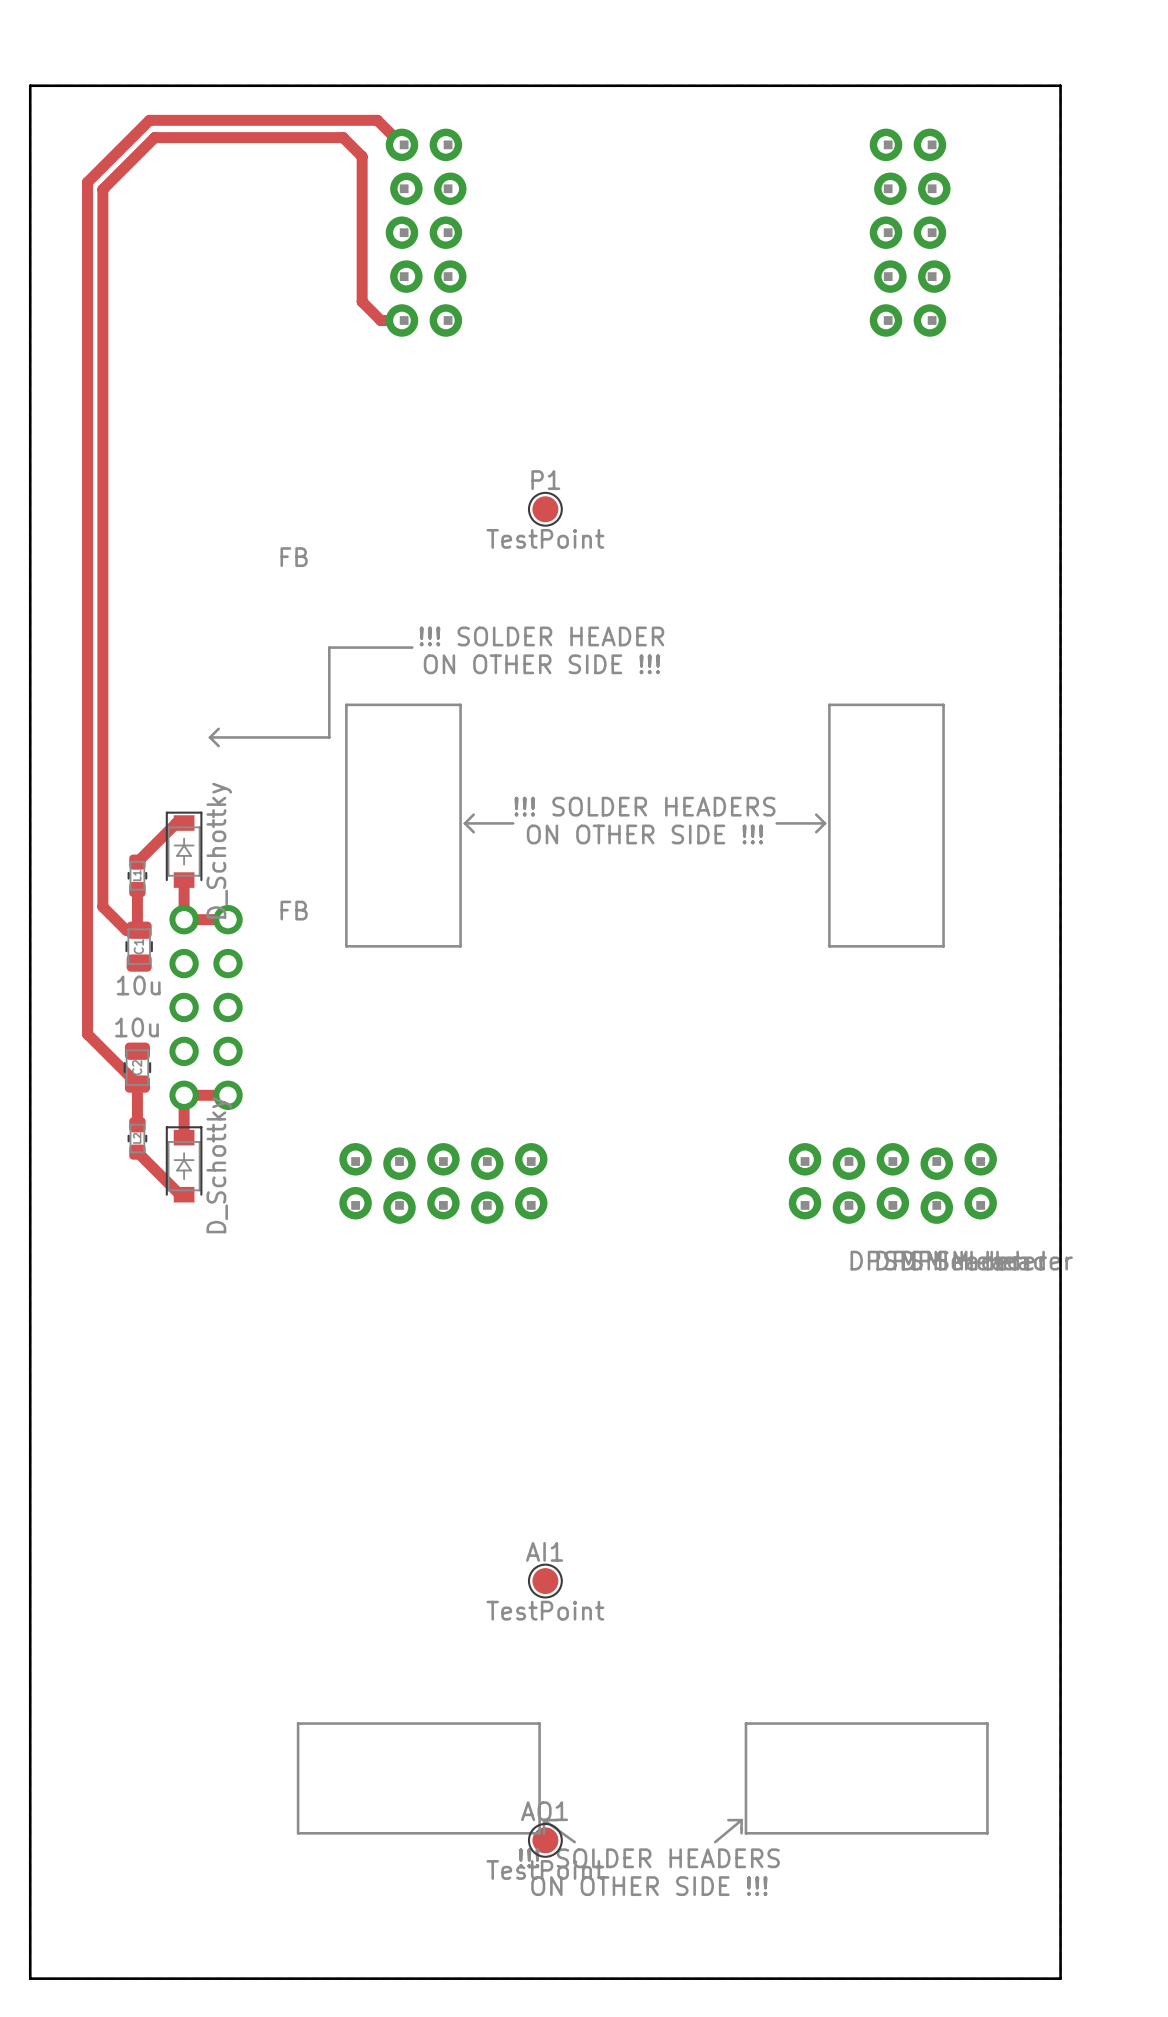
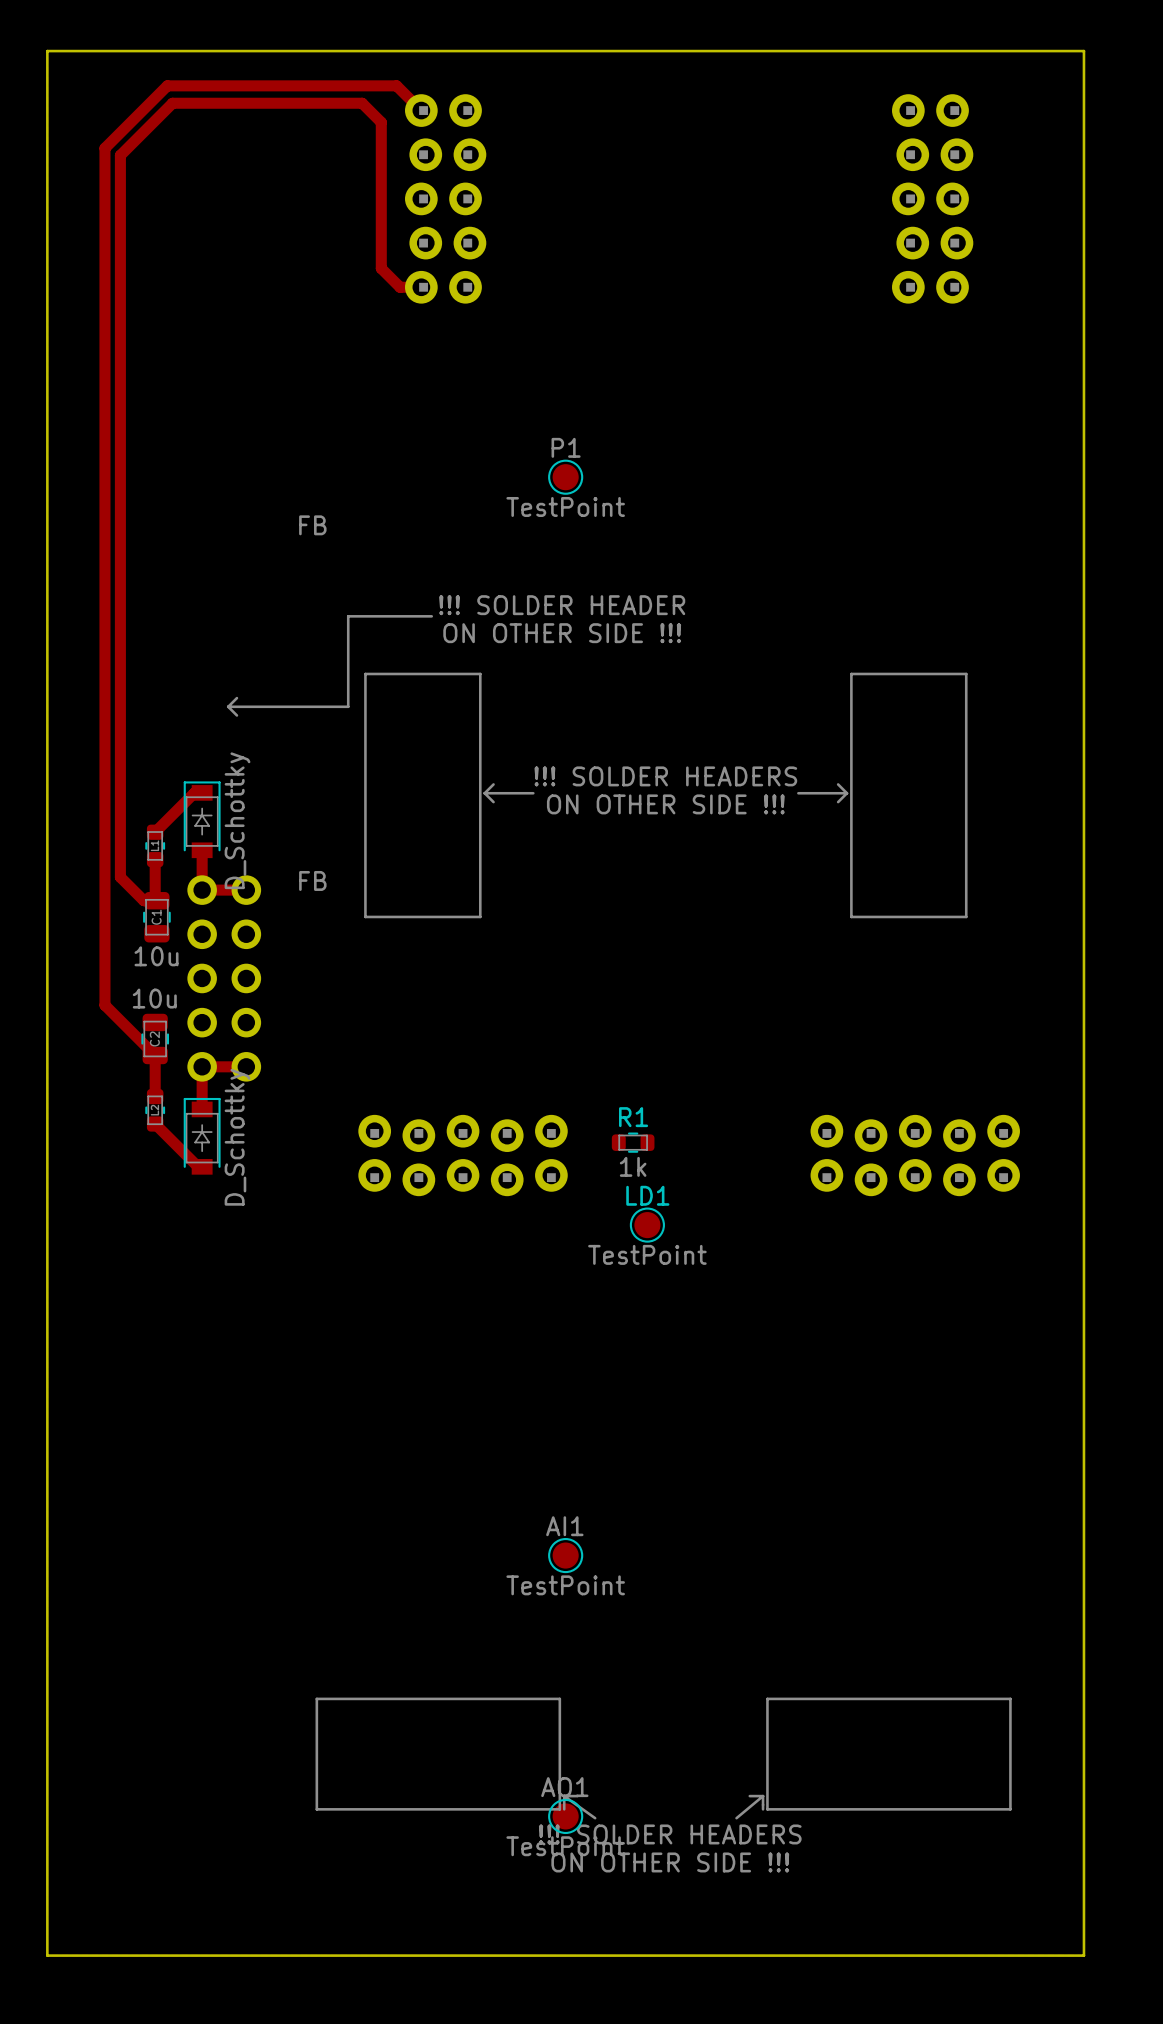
R1: none -> 1k (633, 1142)
drawing: [850, 1250, 1073, 1271] -> none
LD1: none -> TestPoint (647, 1225)

